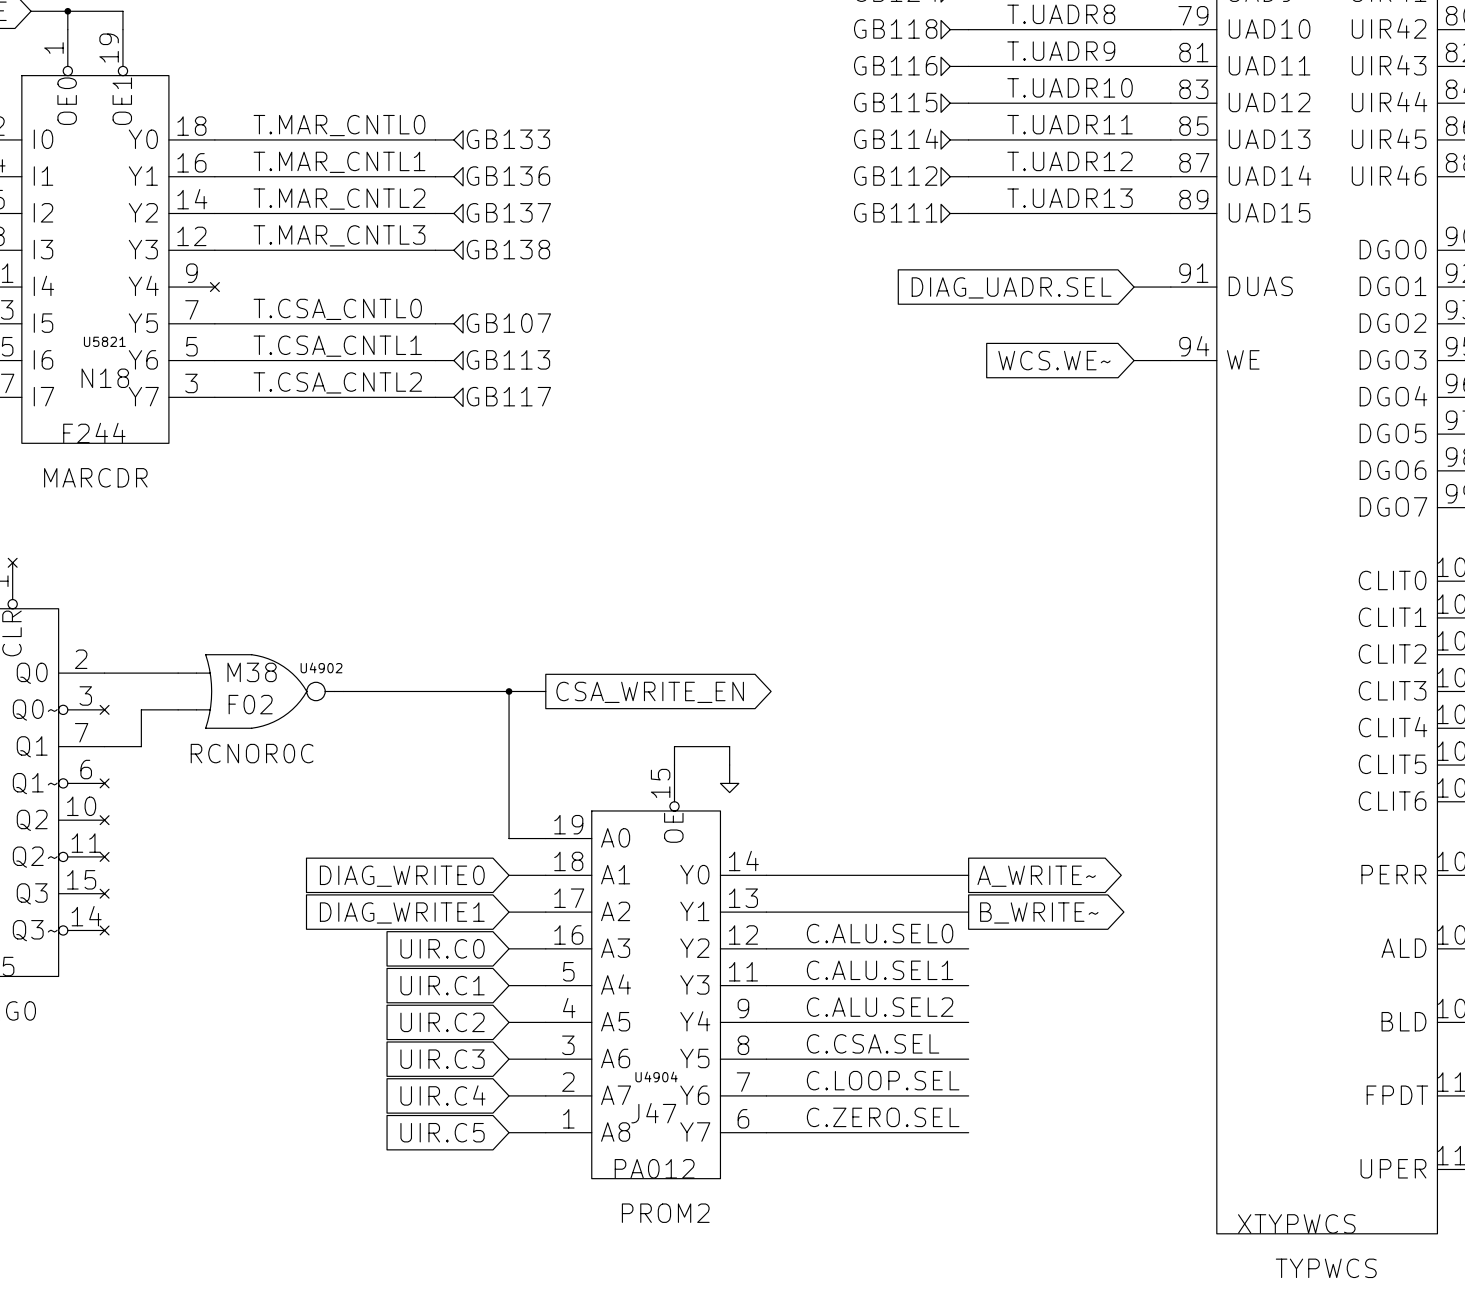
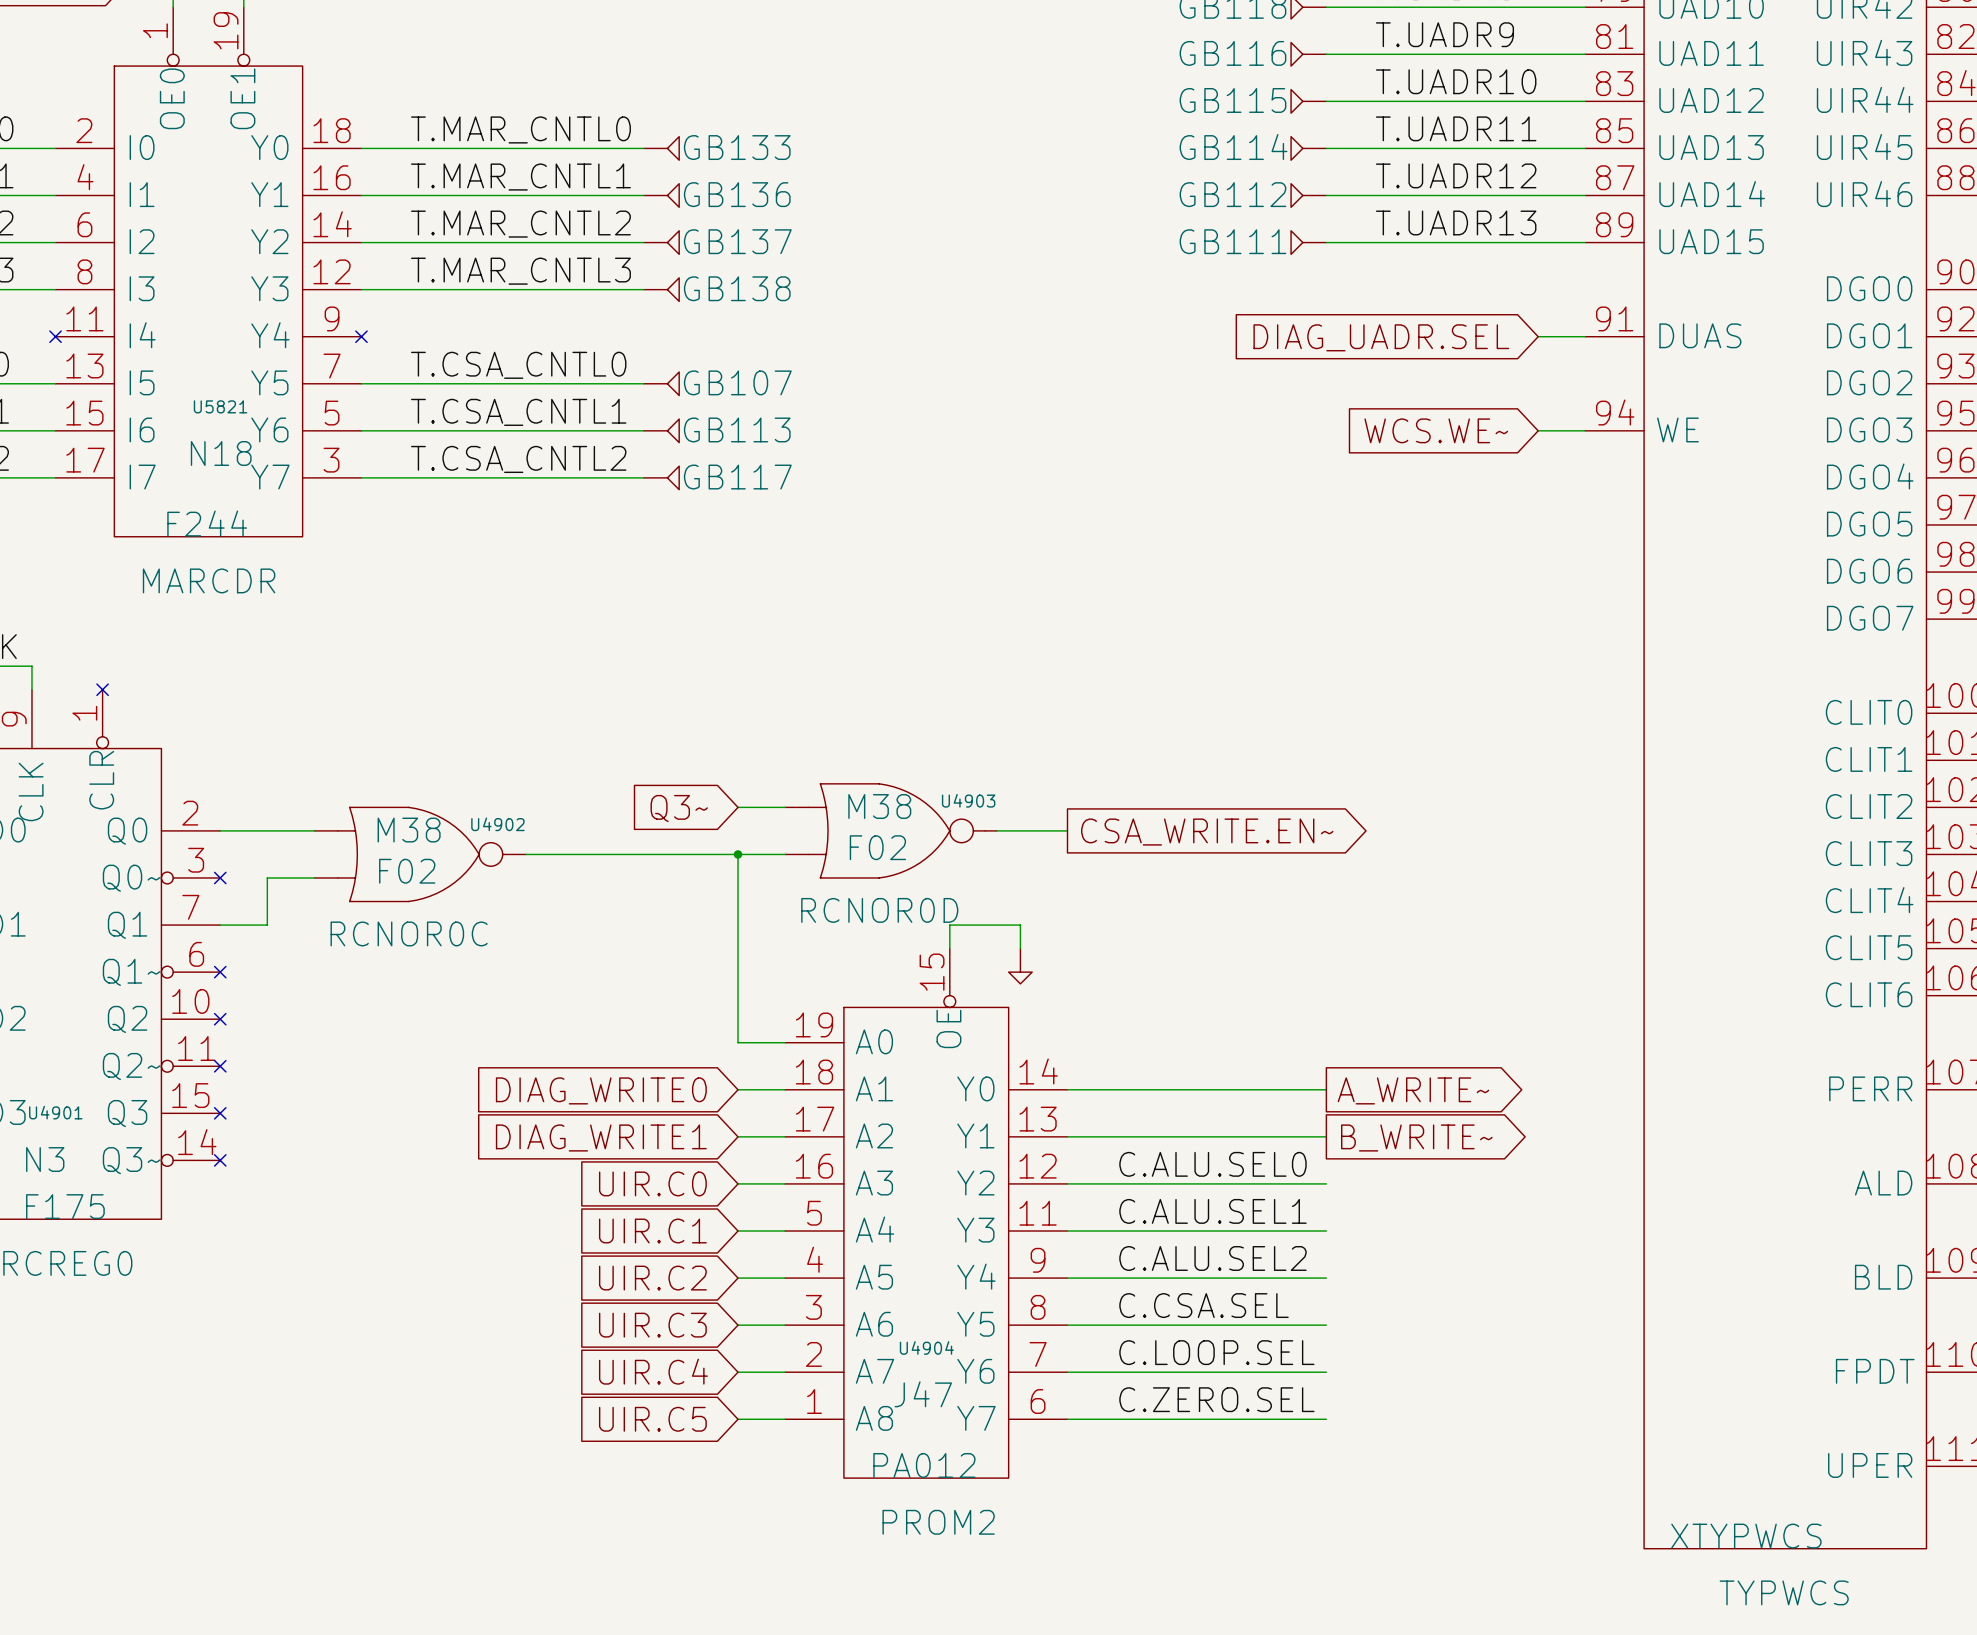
wire: none -> (738, 807) (785, 807)
global label: none -> Q3~ (679, 808)
U4903: none -> F02 (890, 830)
wire: none -> (996, 830) (1067, 830)
global label: none -> CSA_WRITE.EN~ (1207, 832)
global label: CSA_WRITE_EN (650, 692) -> none

